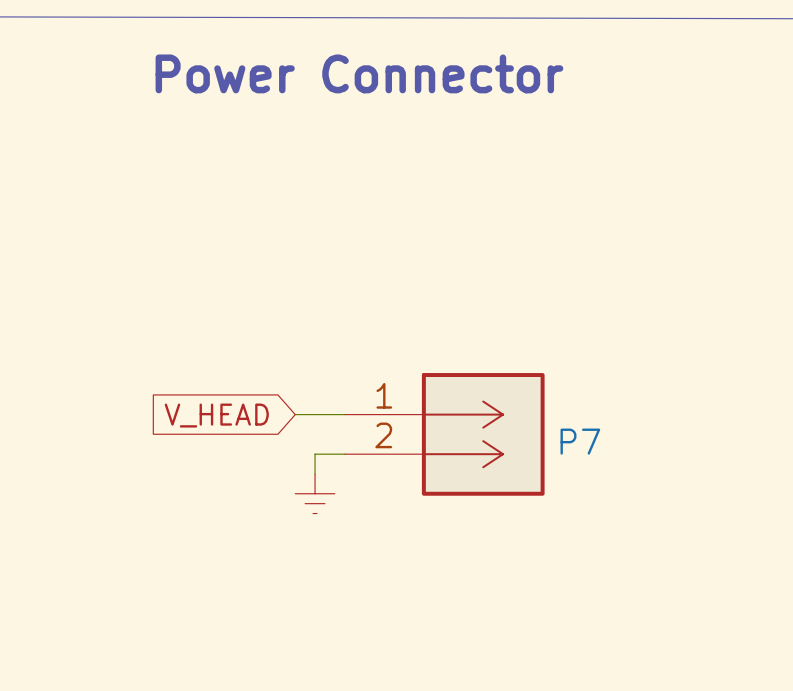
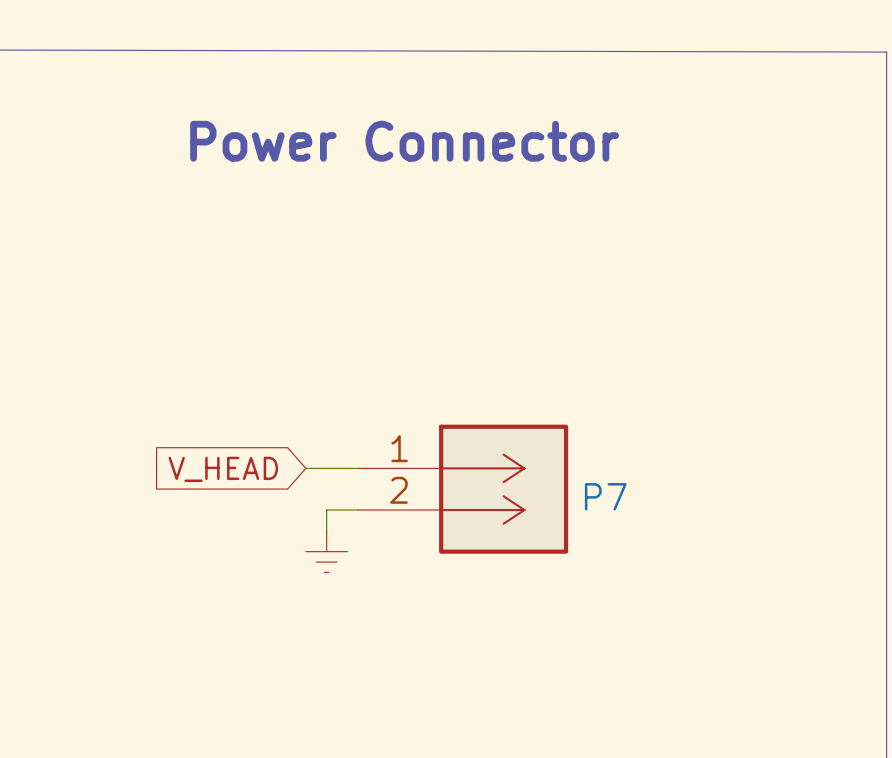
text position: Power Connector (359, 73) -> Power Connector (404, 141)

